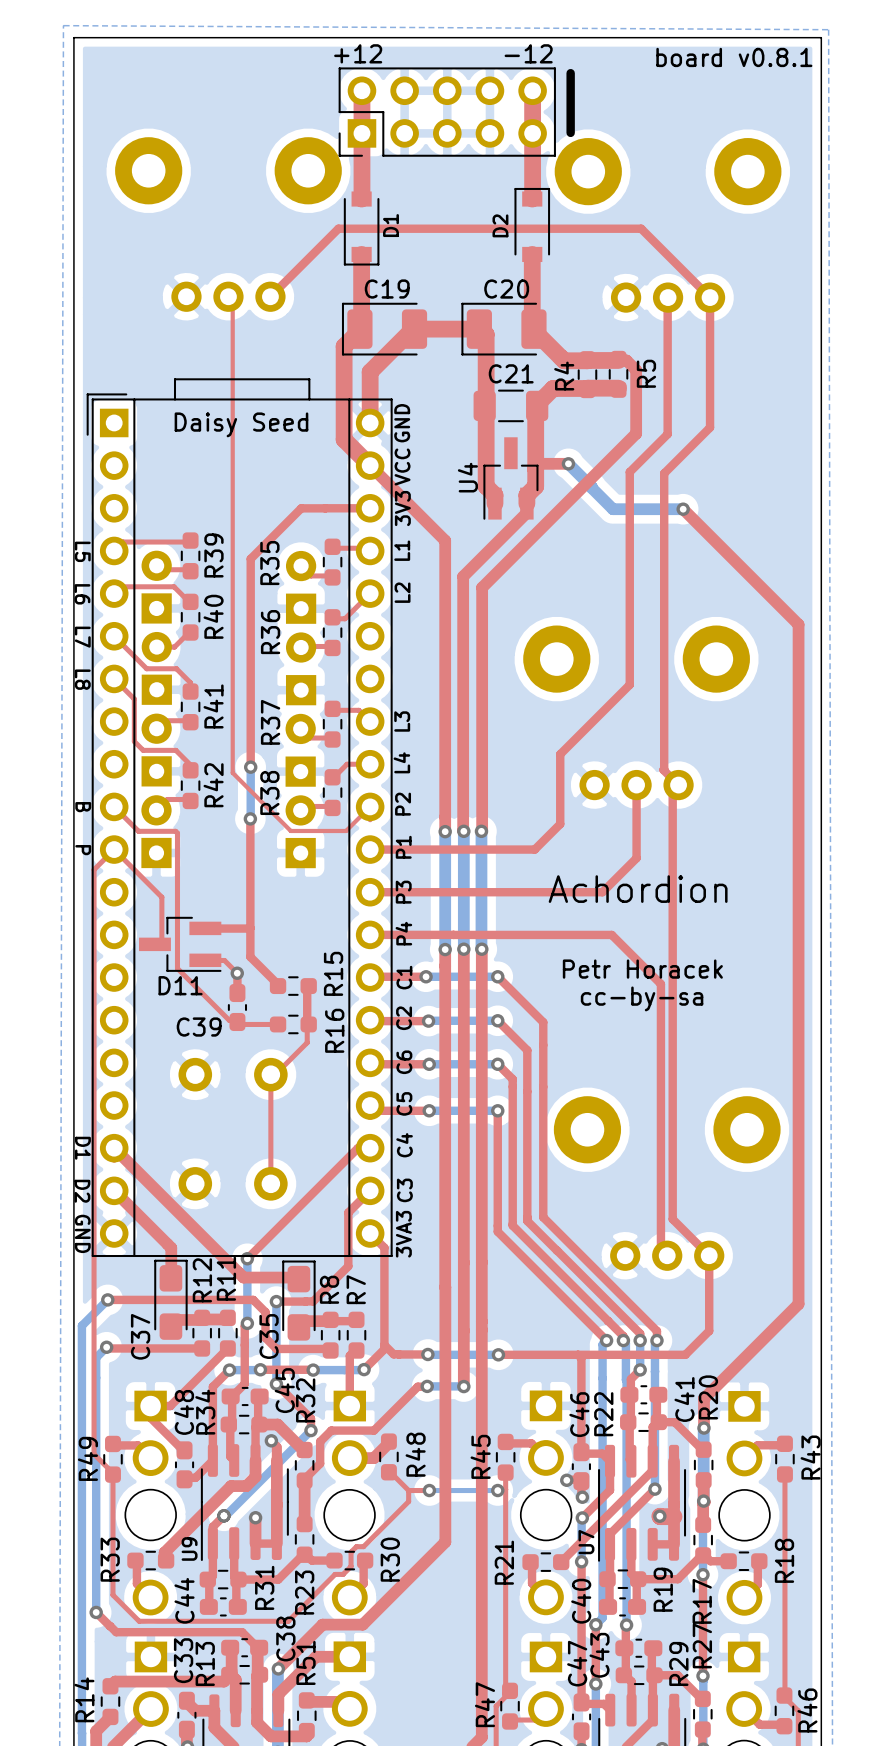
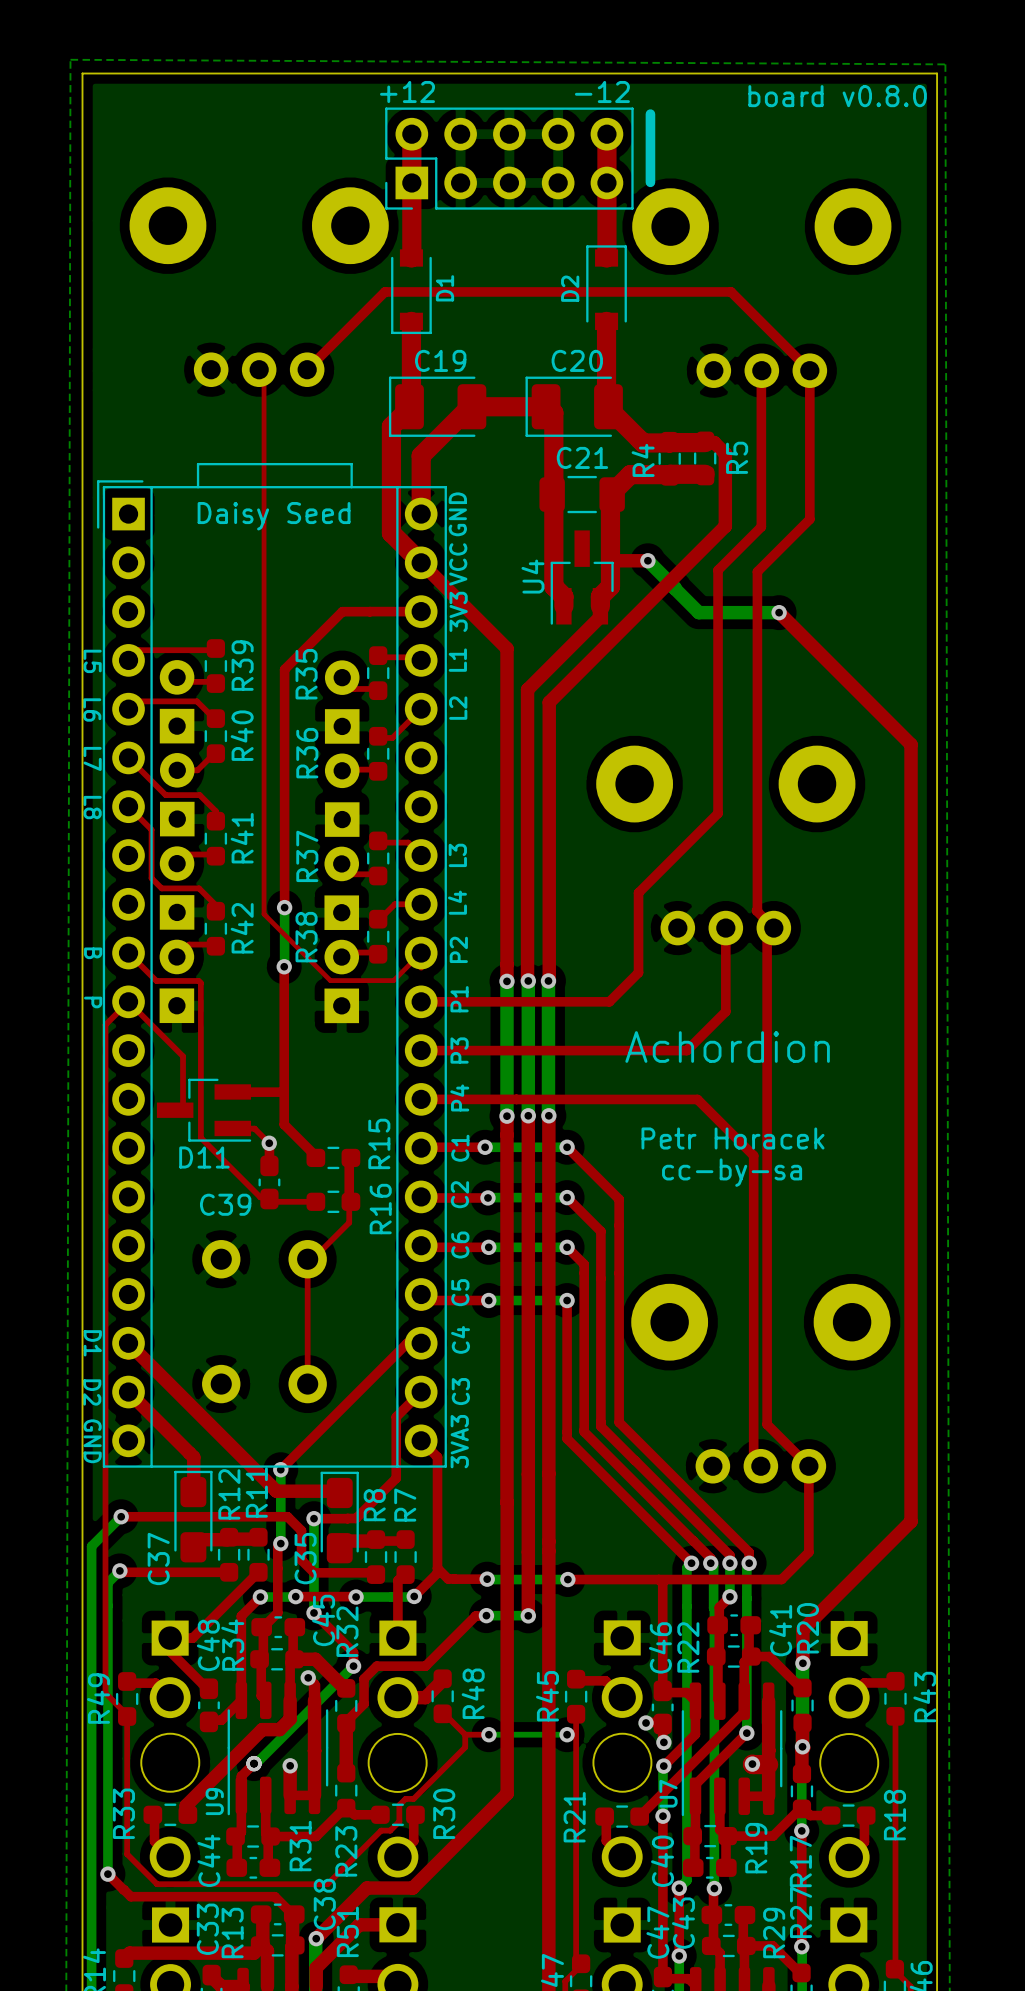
text: board v0.8.1 (734, 57) -> board v0.8.0 (837, 96)

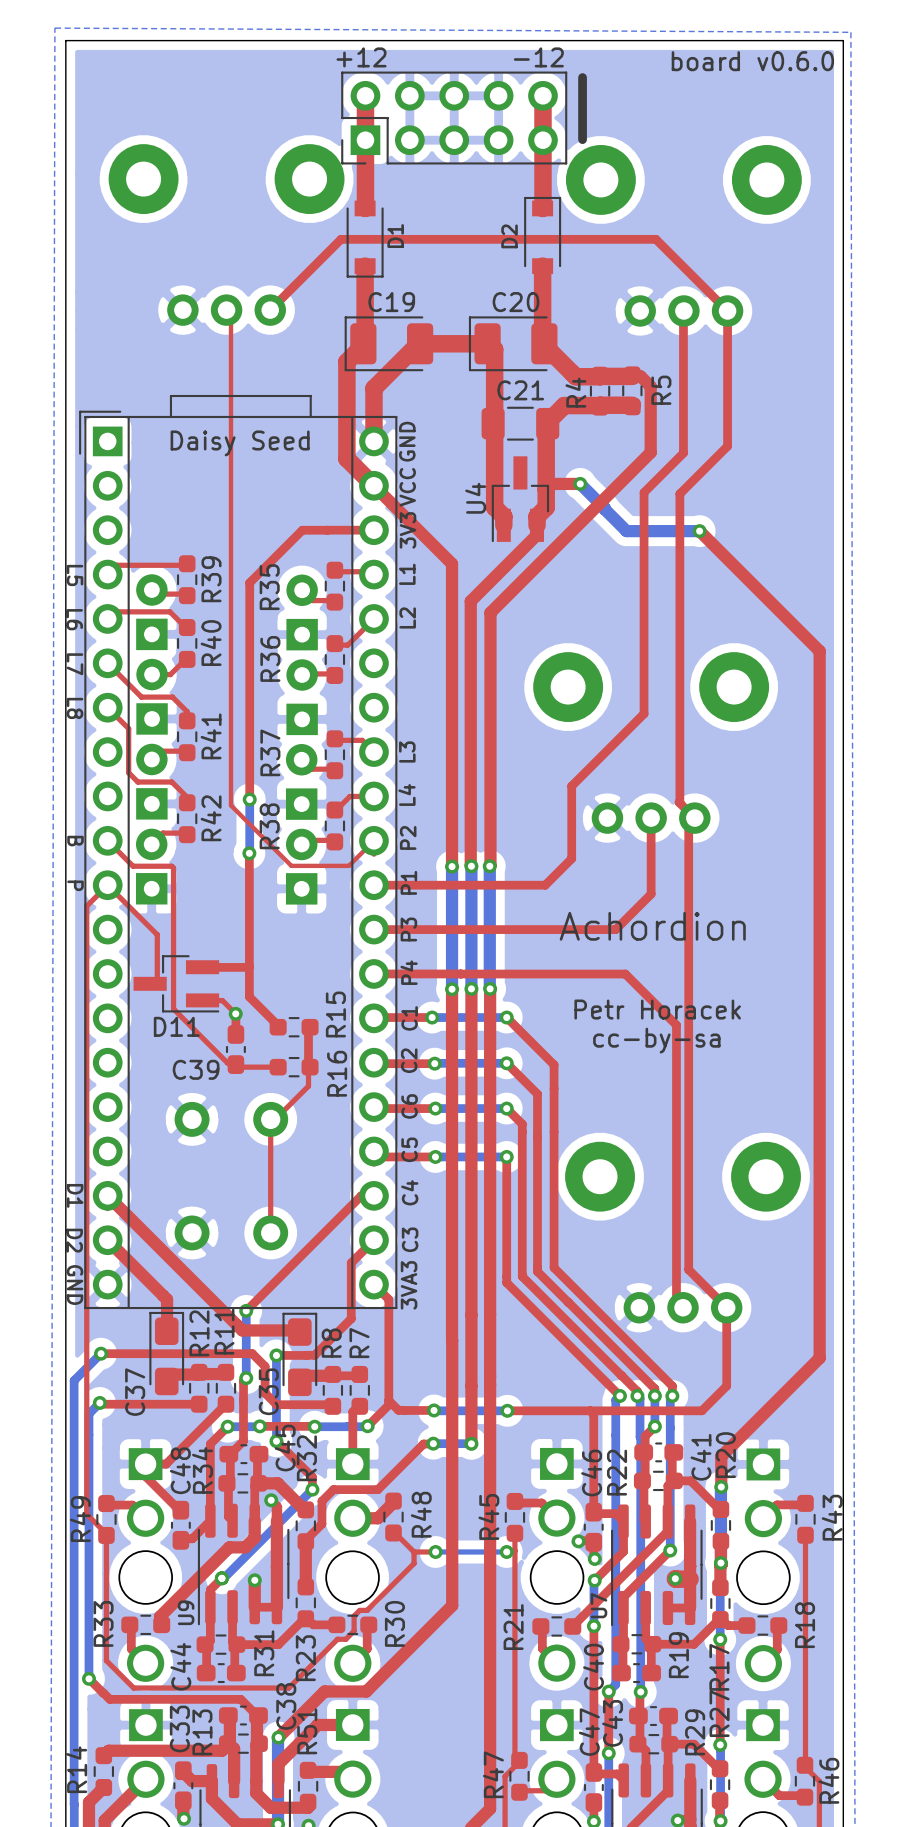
text: board v0.8.0 (837, 96) -> board v0.6.0 (752, 61)

